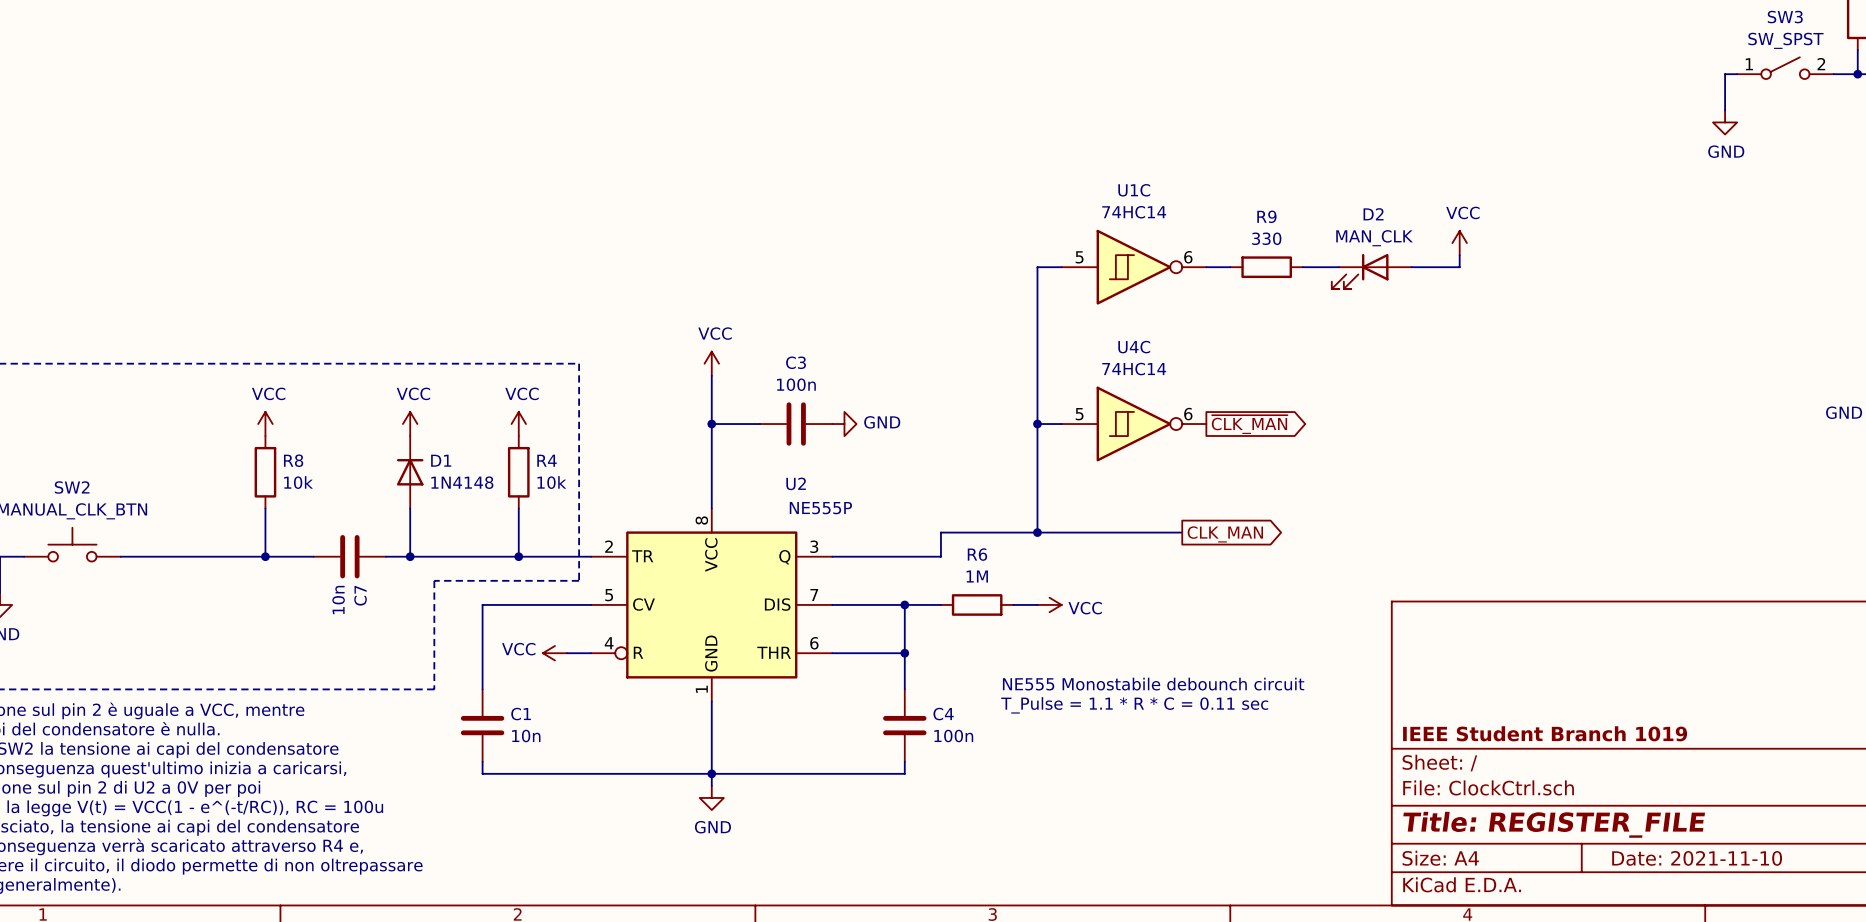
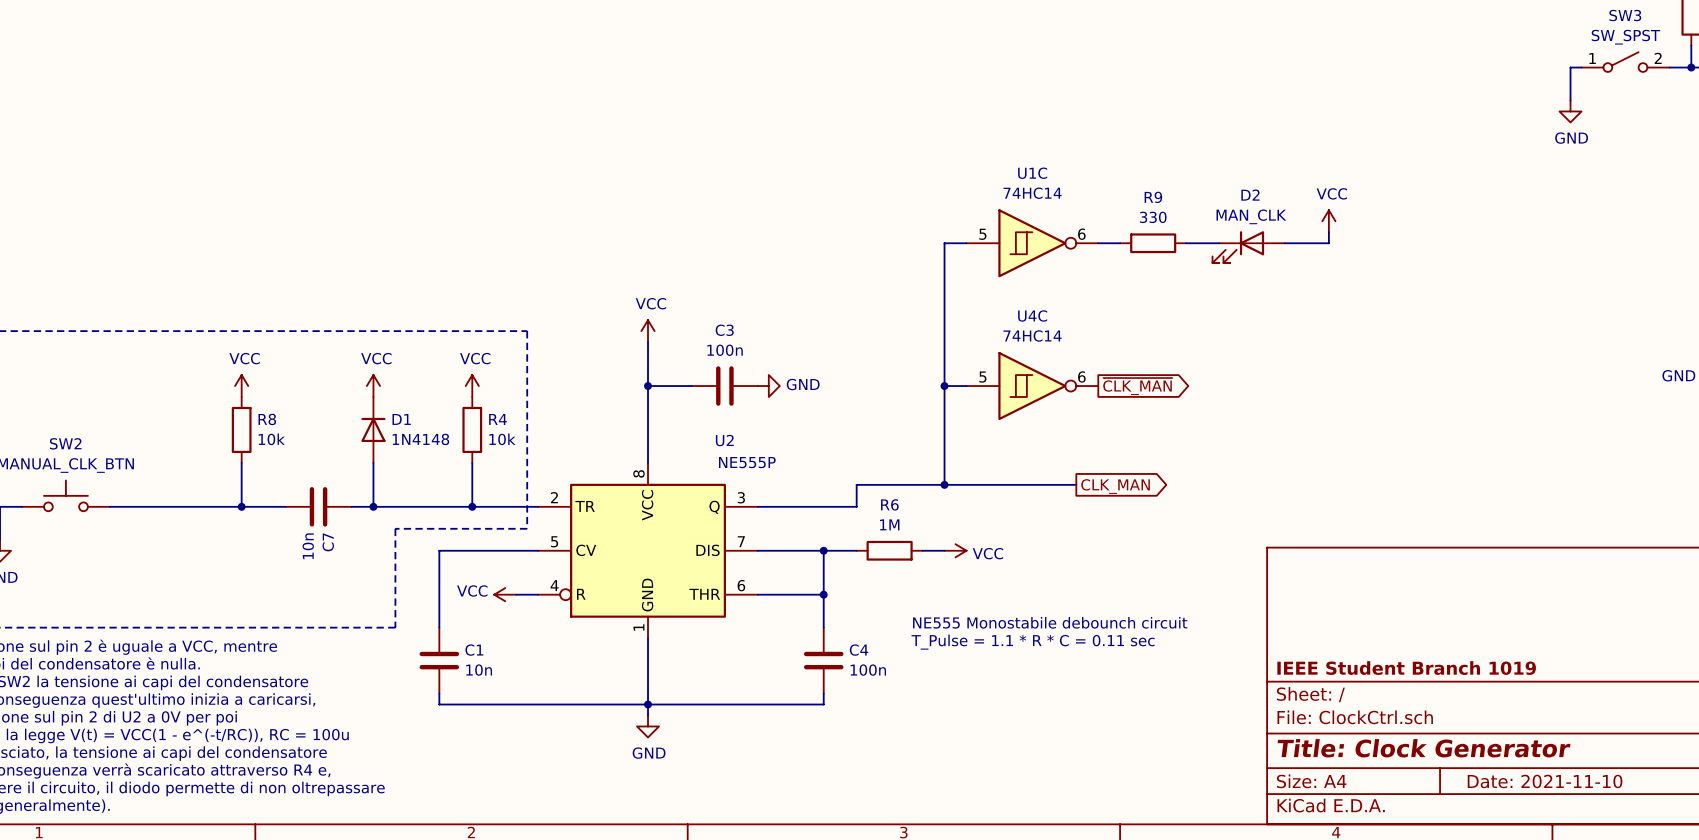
title block: Title: REGISTER_FILE (1554, 824) -> Title: Clock Generator (1424, 748)

